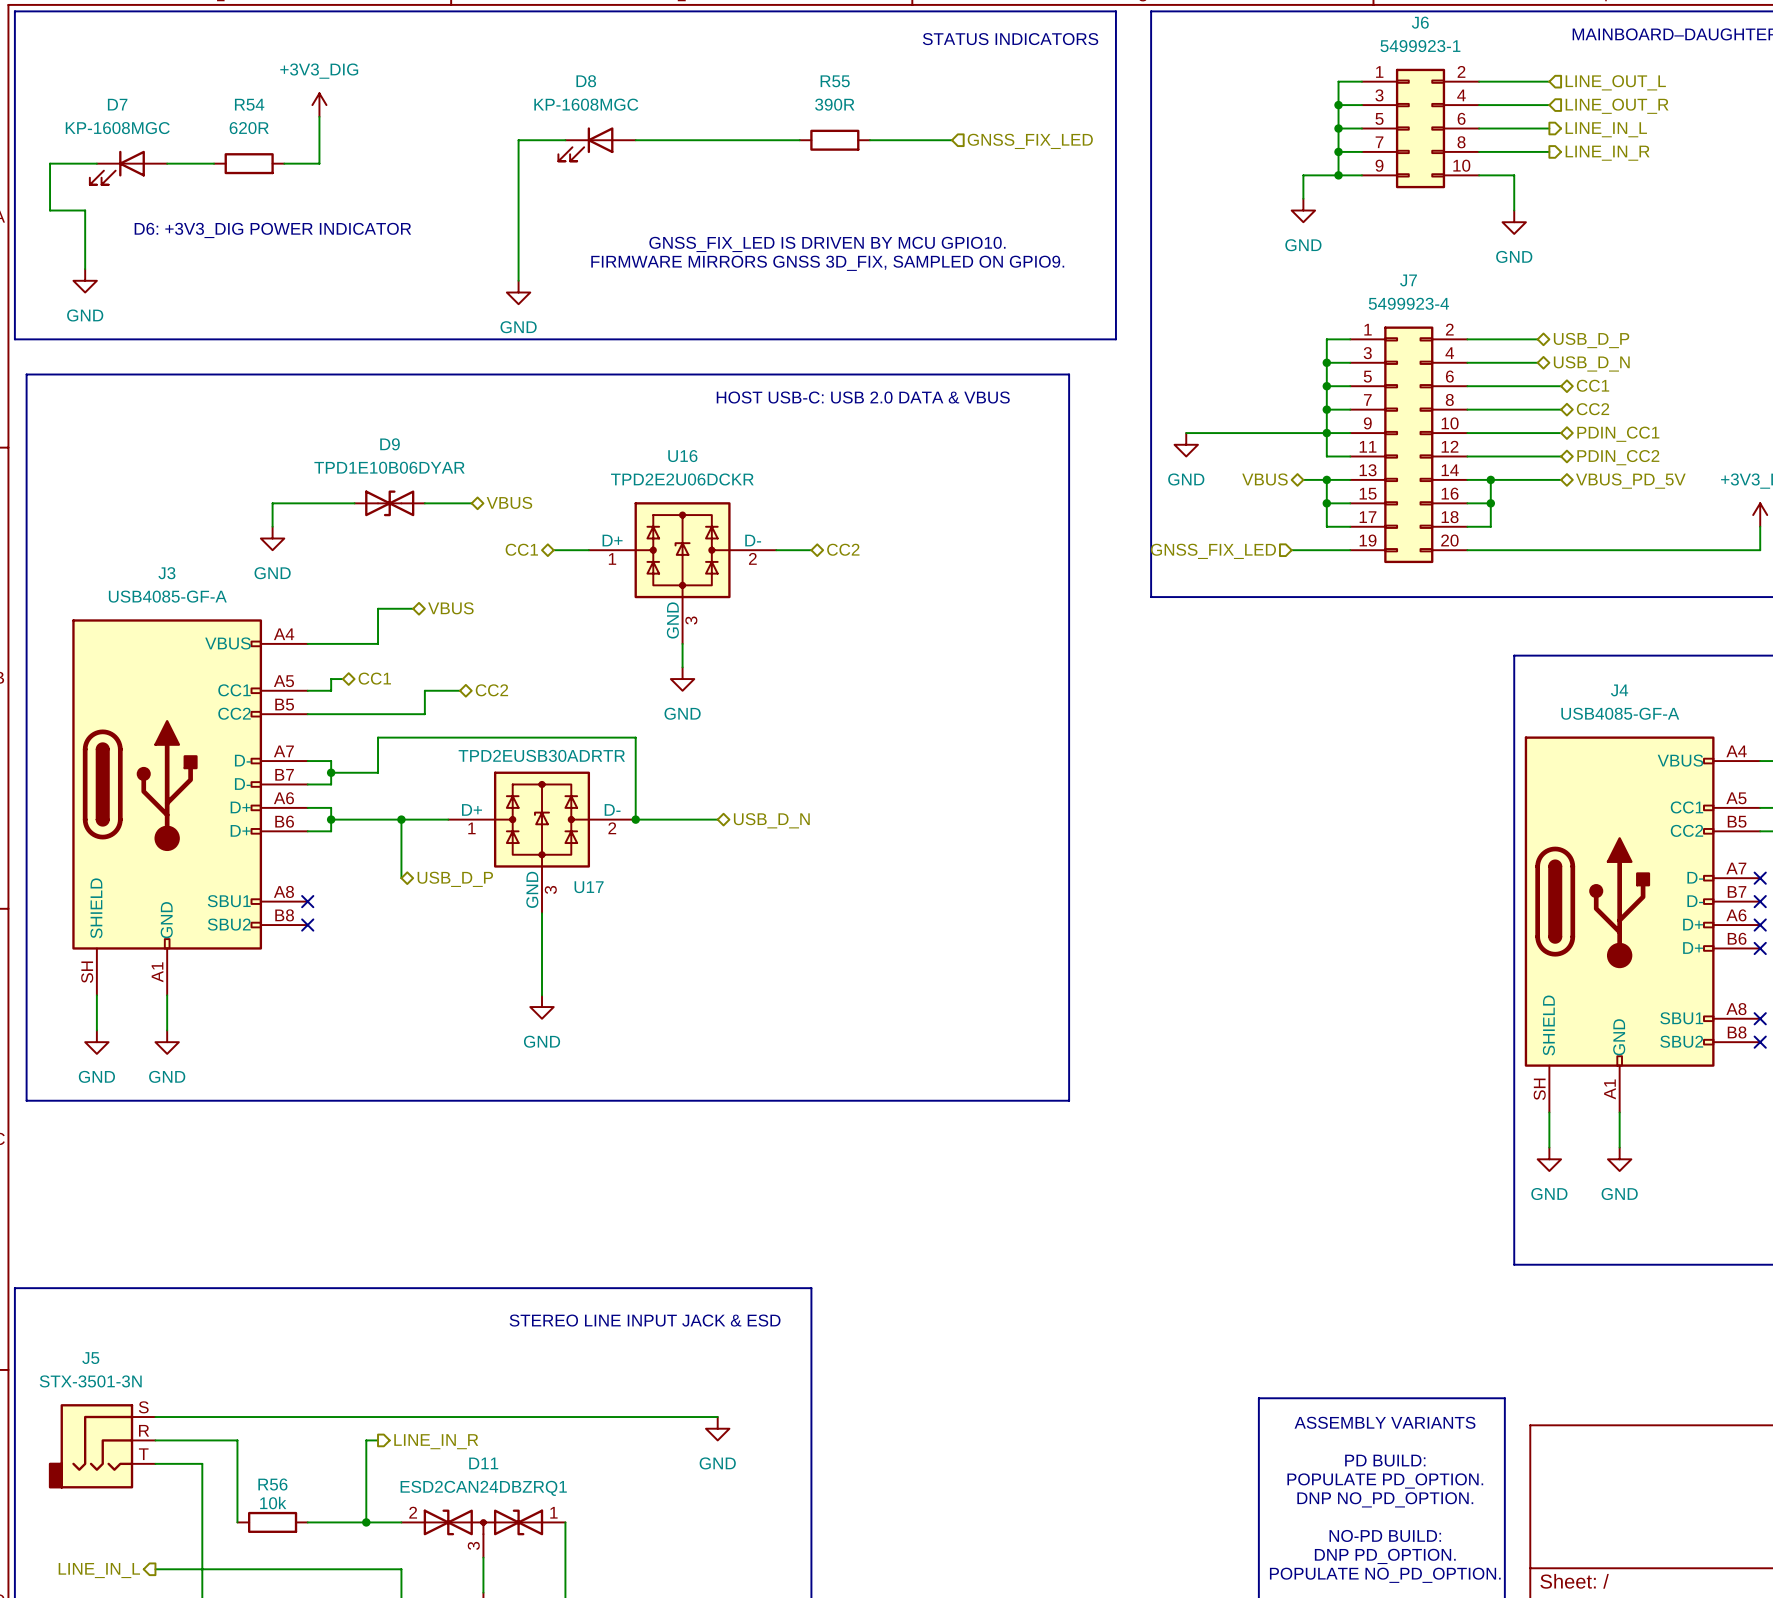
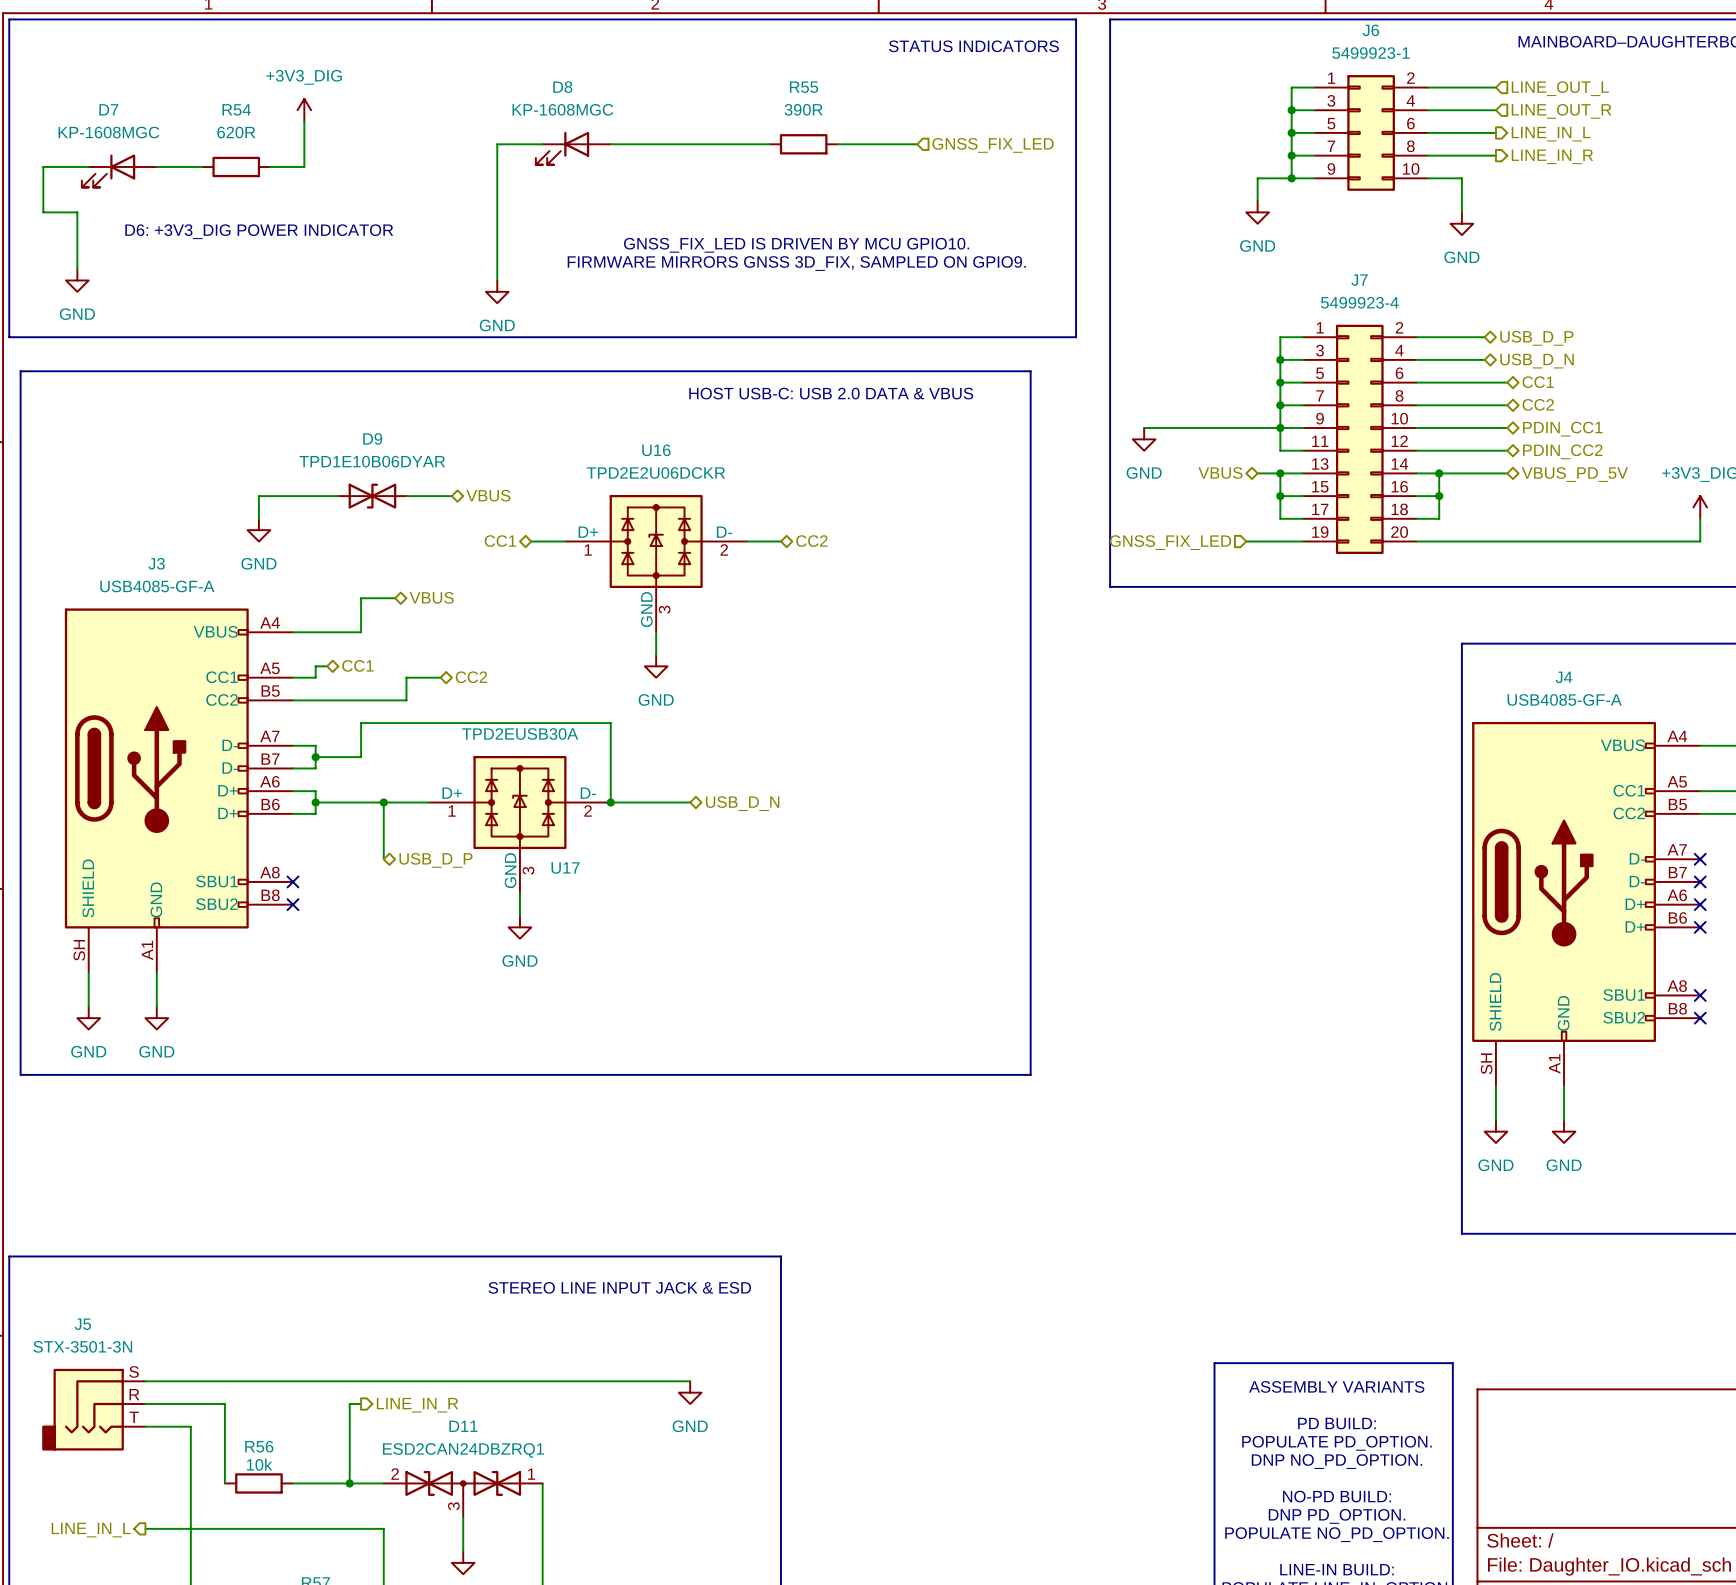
U17 value: TPD2EUSB30ADRTR (541, 755) -> TPD2EUSB30A (520, 734)
wire: (542, 936) (542, 995) -> none
power symbol position: GND (542, 1007) -> GND (519, 927)

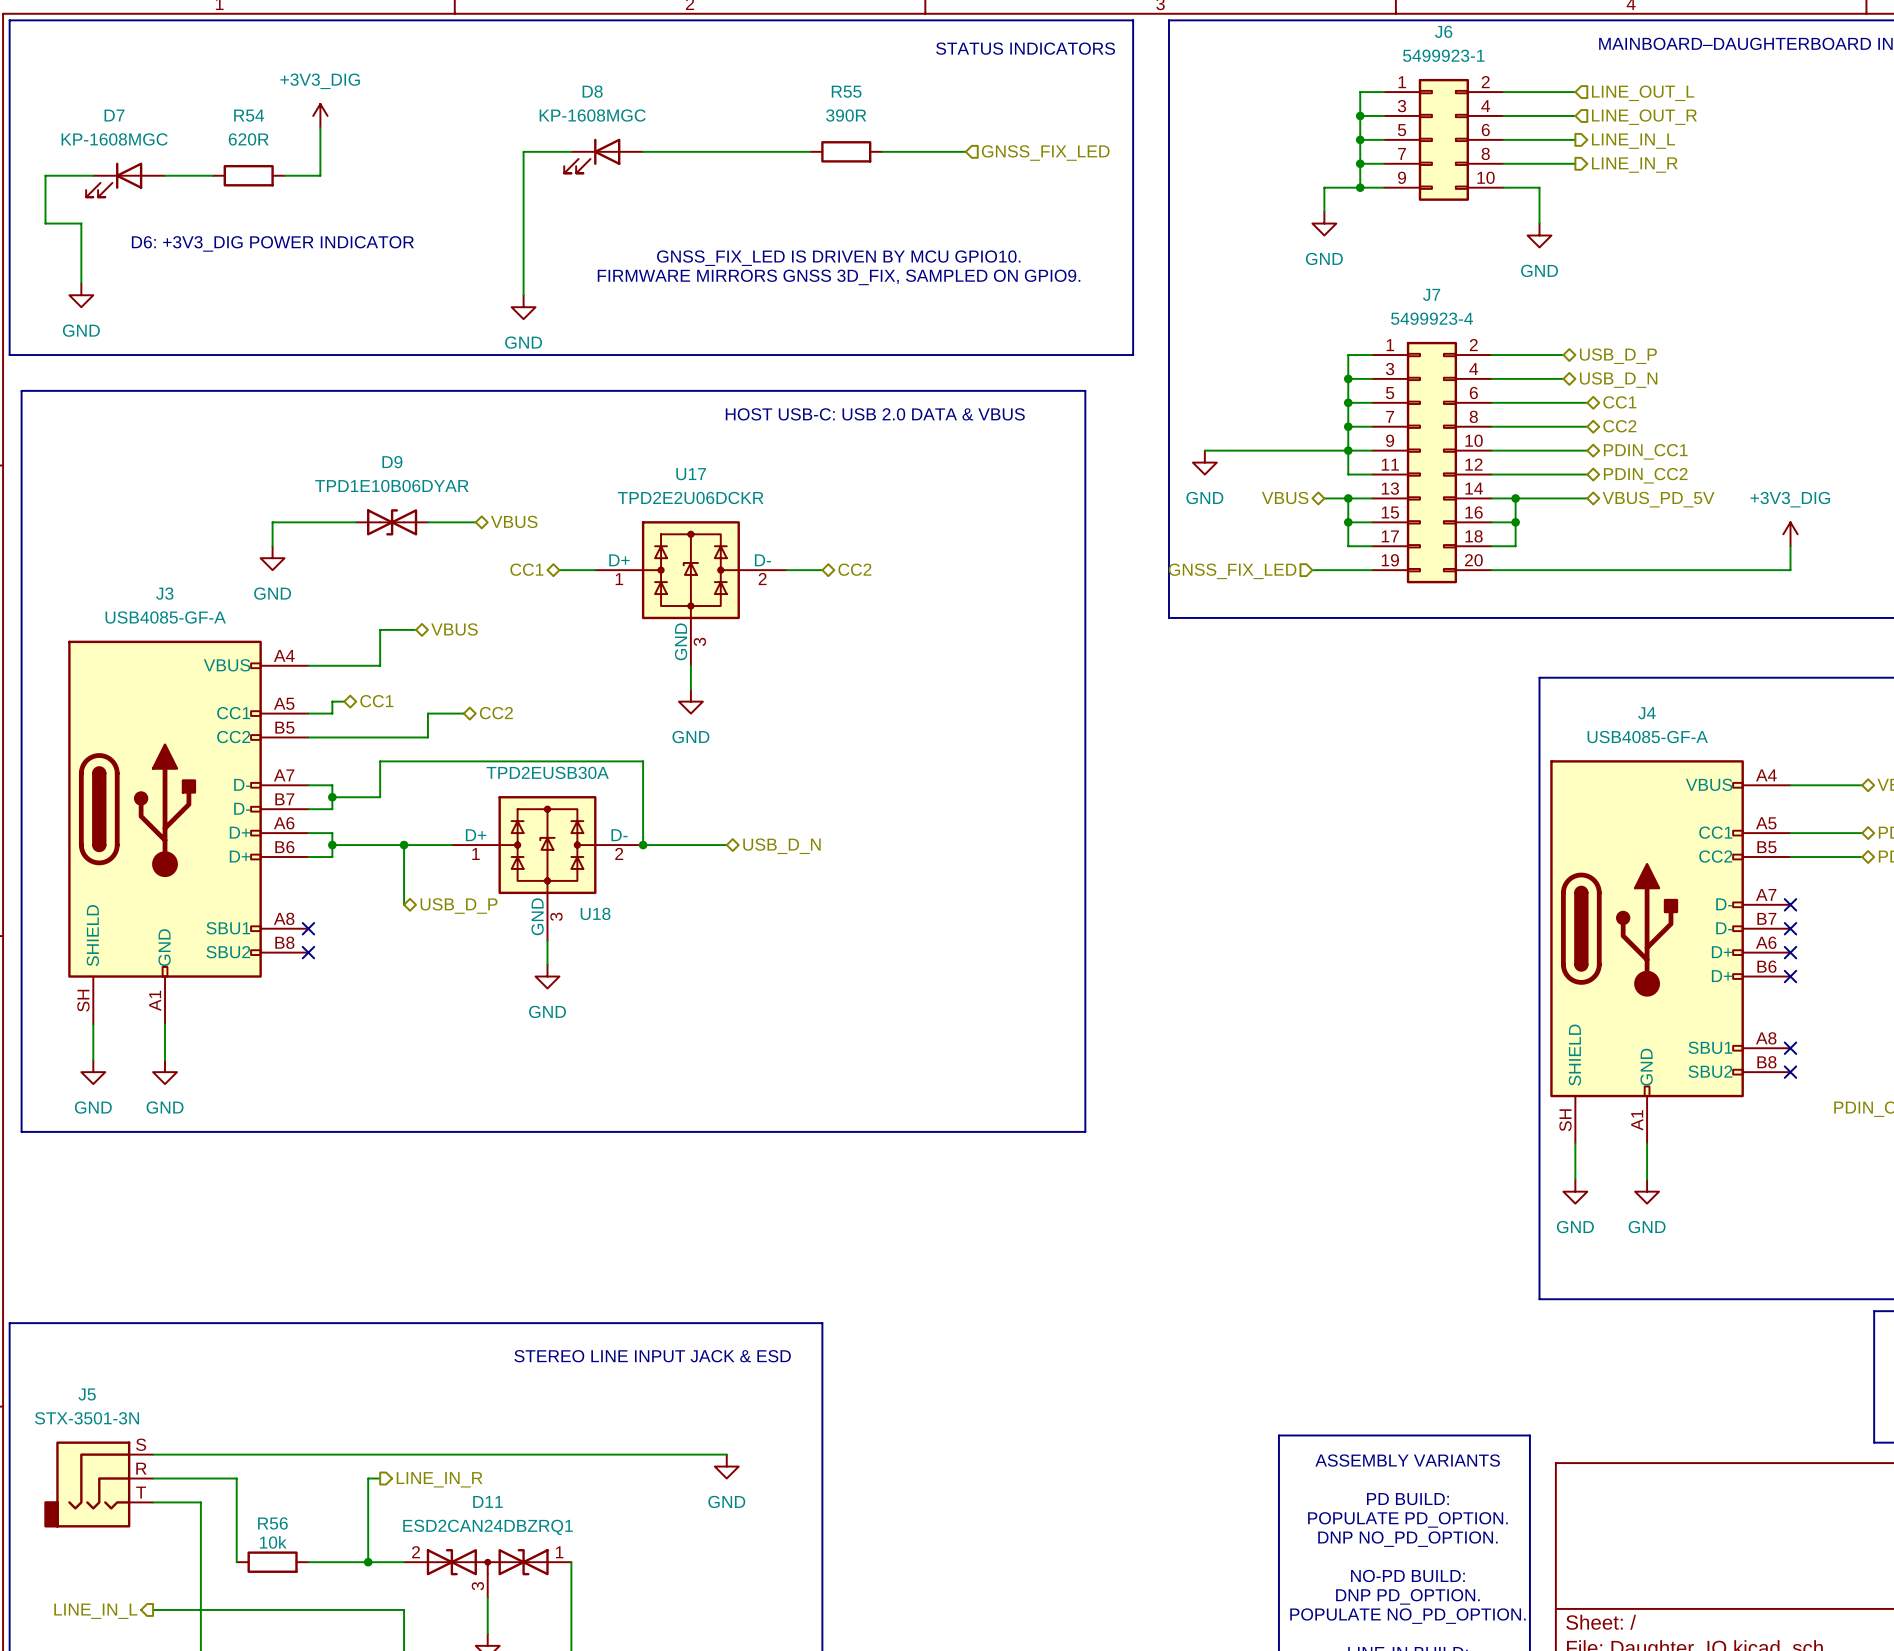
U16 name: U16 (656, 450) -> U17 (691, 474)
U17 name: U17 (565, 868) -> U18 (595, 913)

